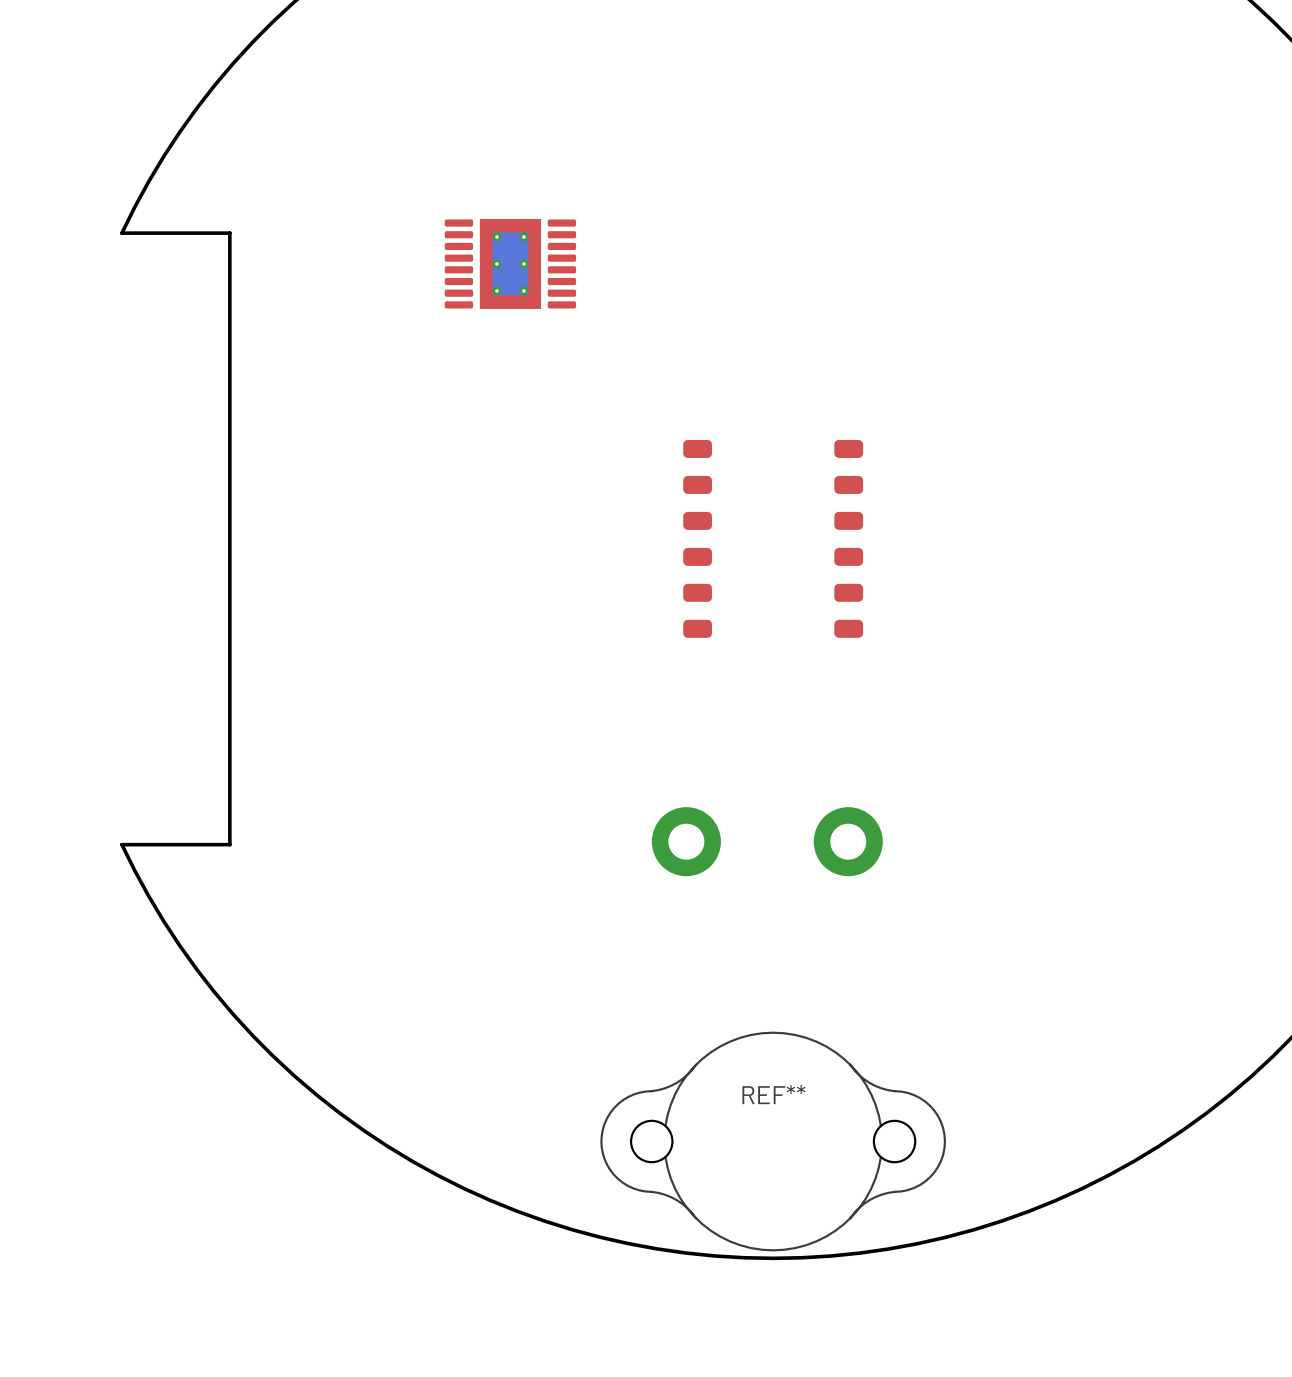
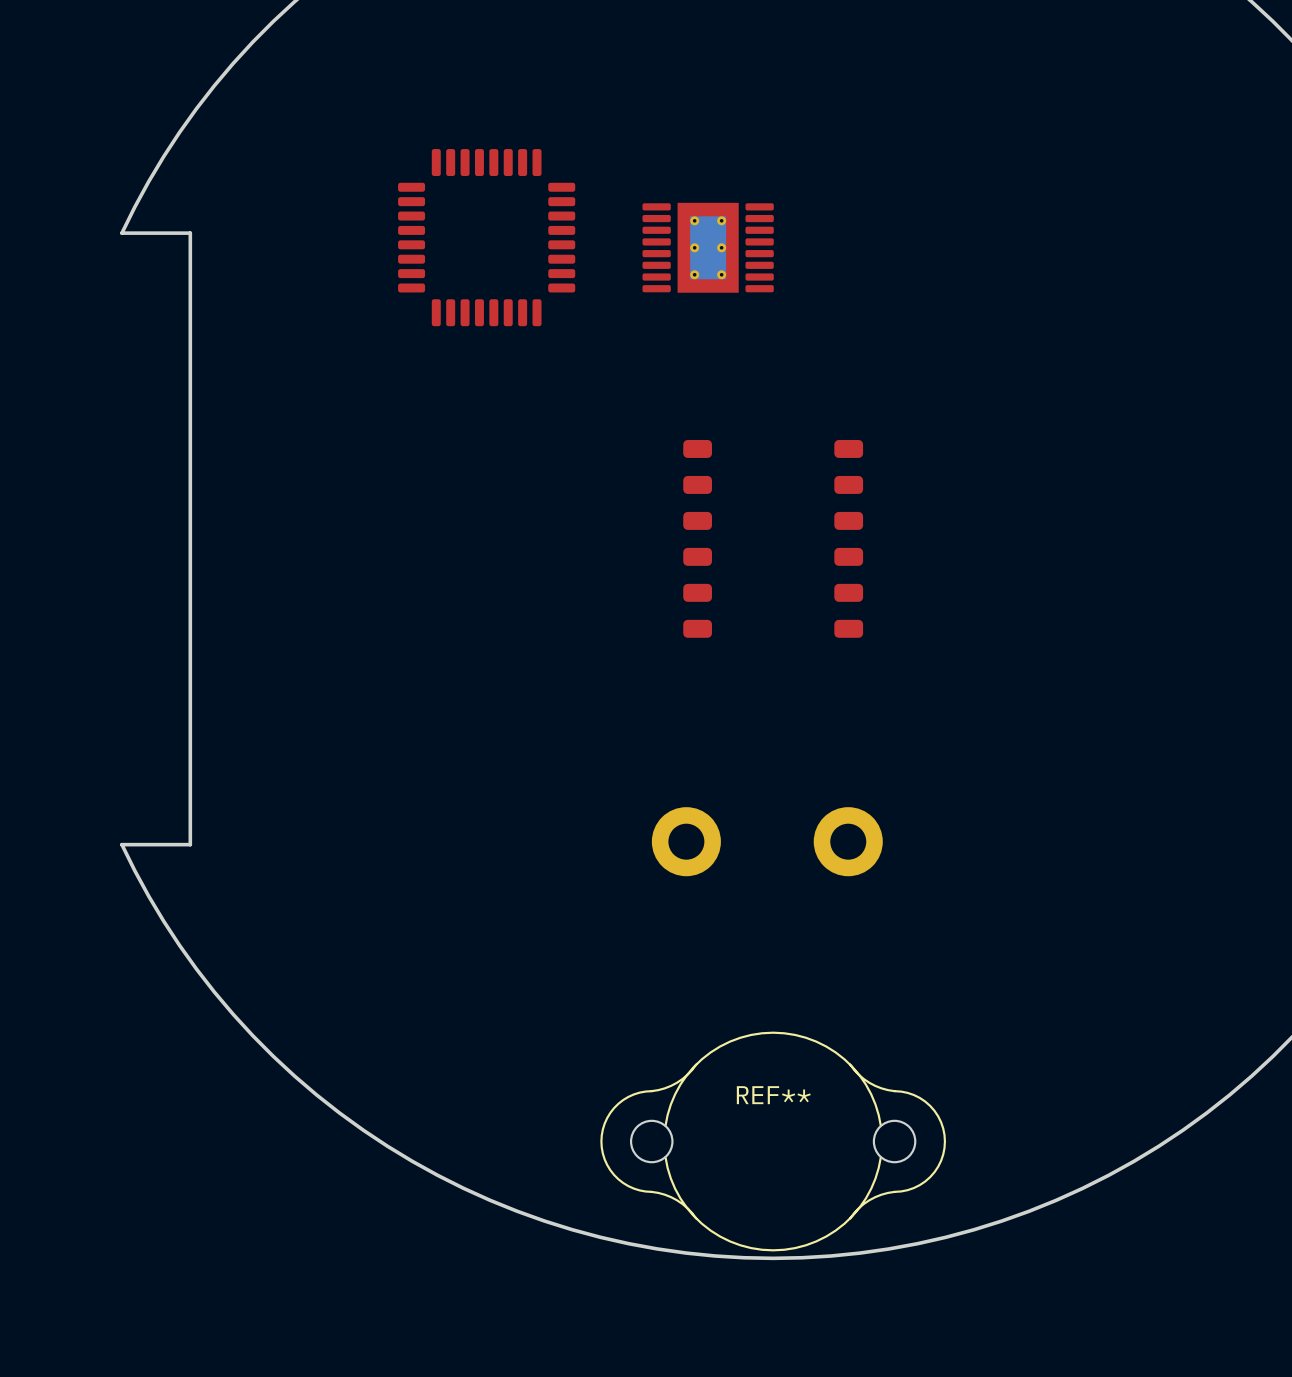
board edge: (190, 233) (229, 233) (229, 844) (190, 844) -> (190, 233) (190, 844)
part: none -> (486, 237)
part position: (510, 263) -> (708, 247)

